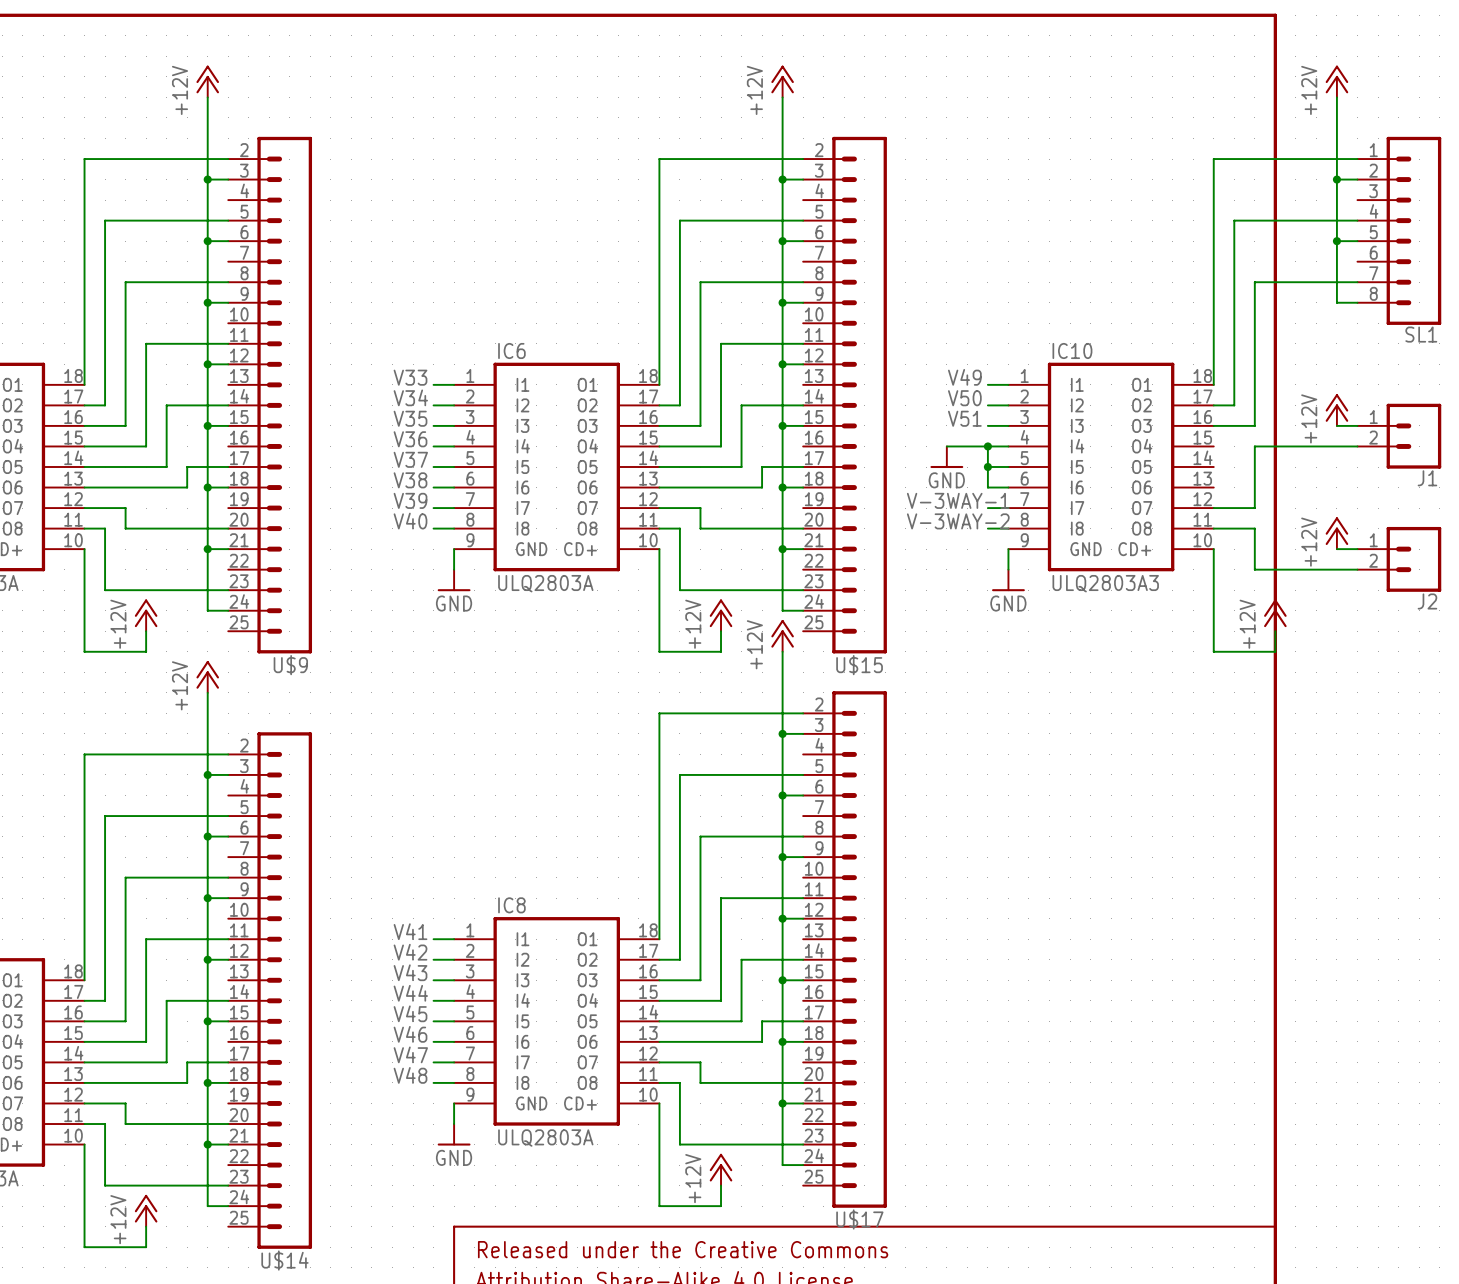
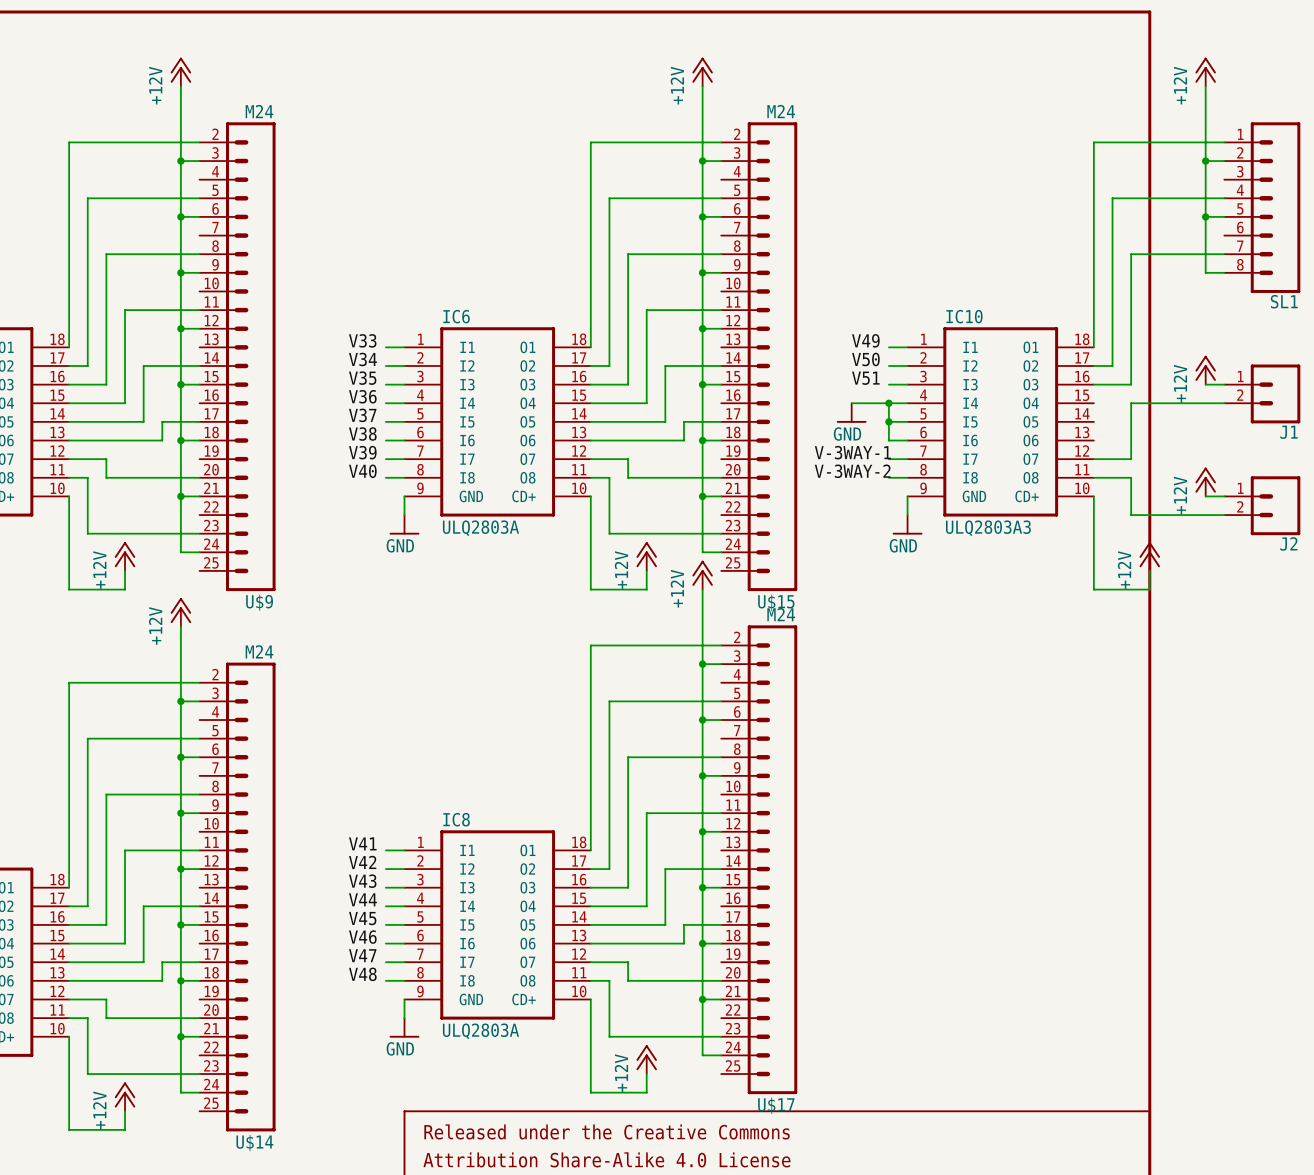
U$9 value: none -> M24 (259, 111)
U$15 value: none -> M24 (781, 111)
U$17 value: none -> M24 (781, 614)
U$14 value: none -> M24 (259, 651)

